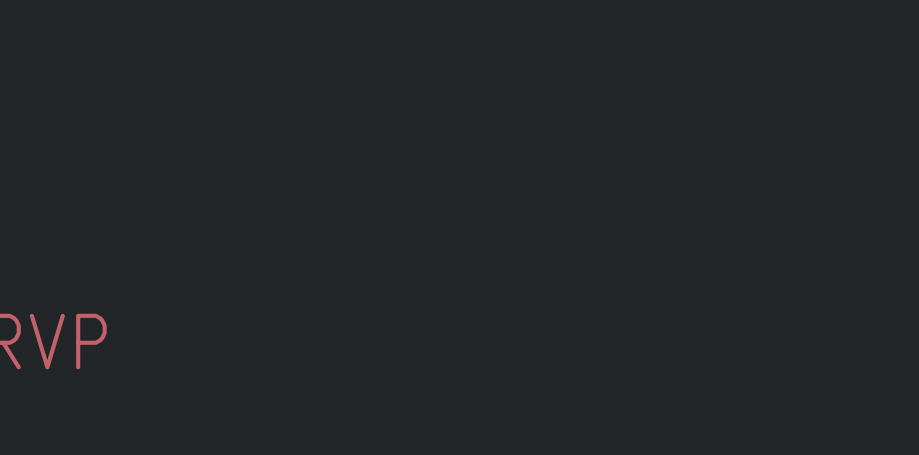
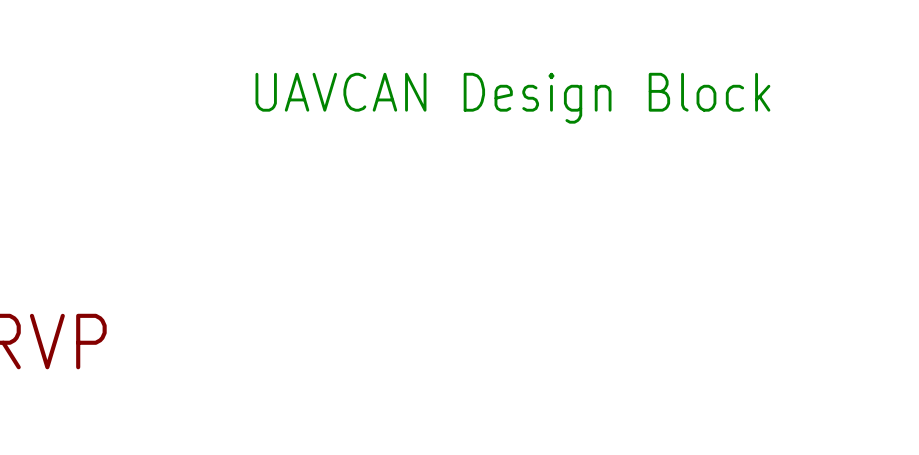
text: none -> UAVCAN Design Block (512, 98)

